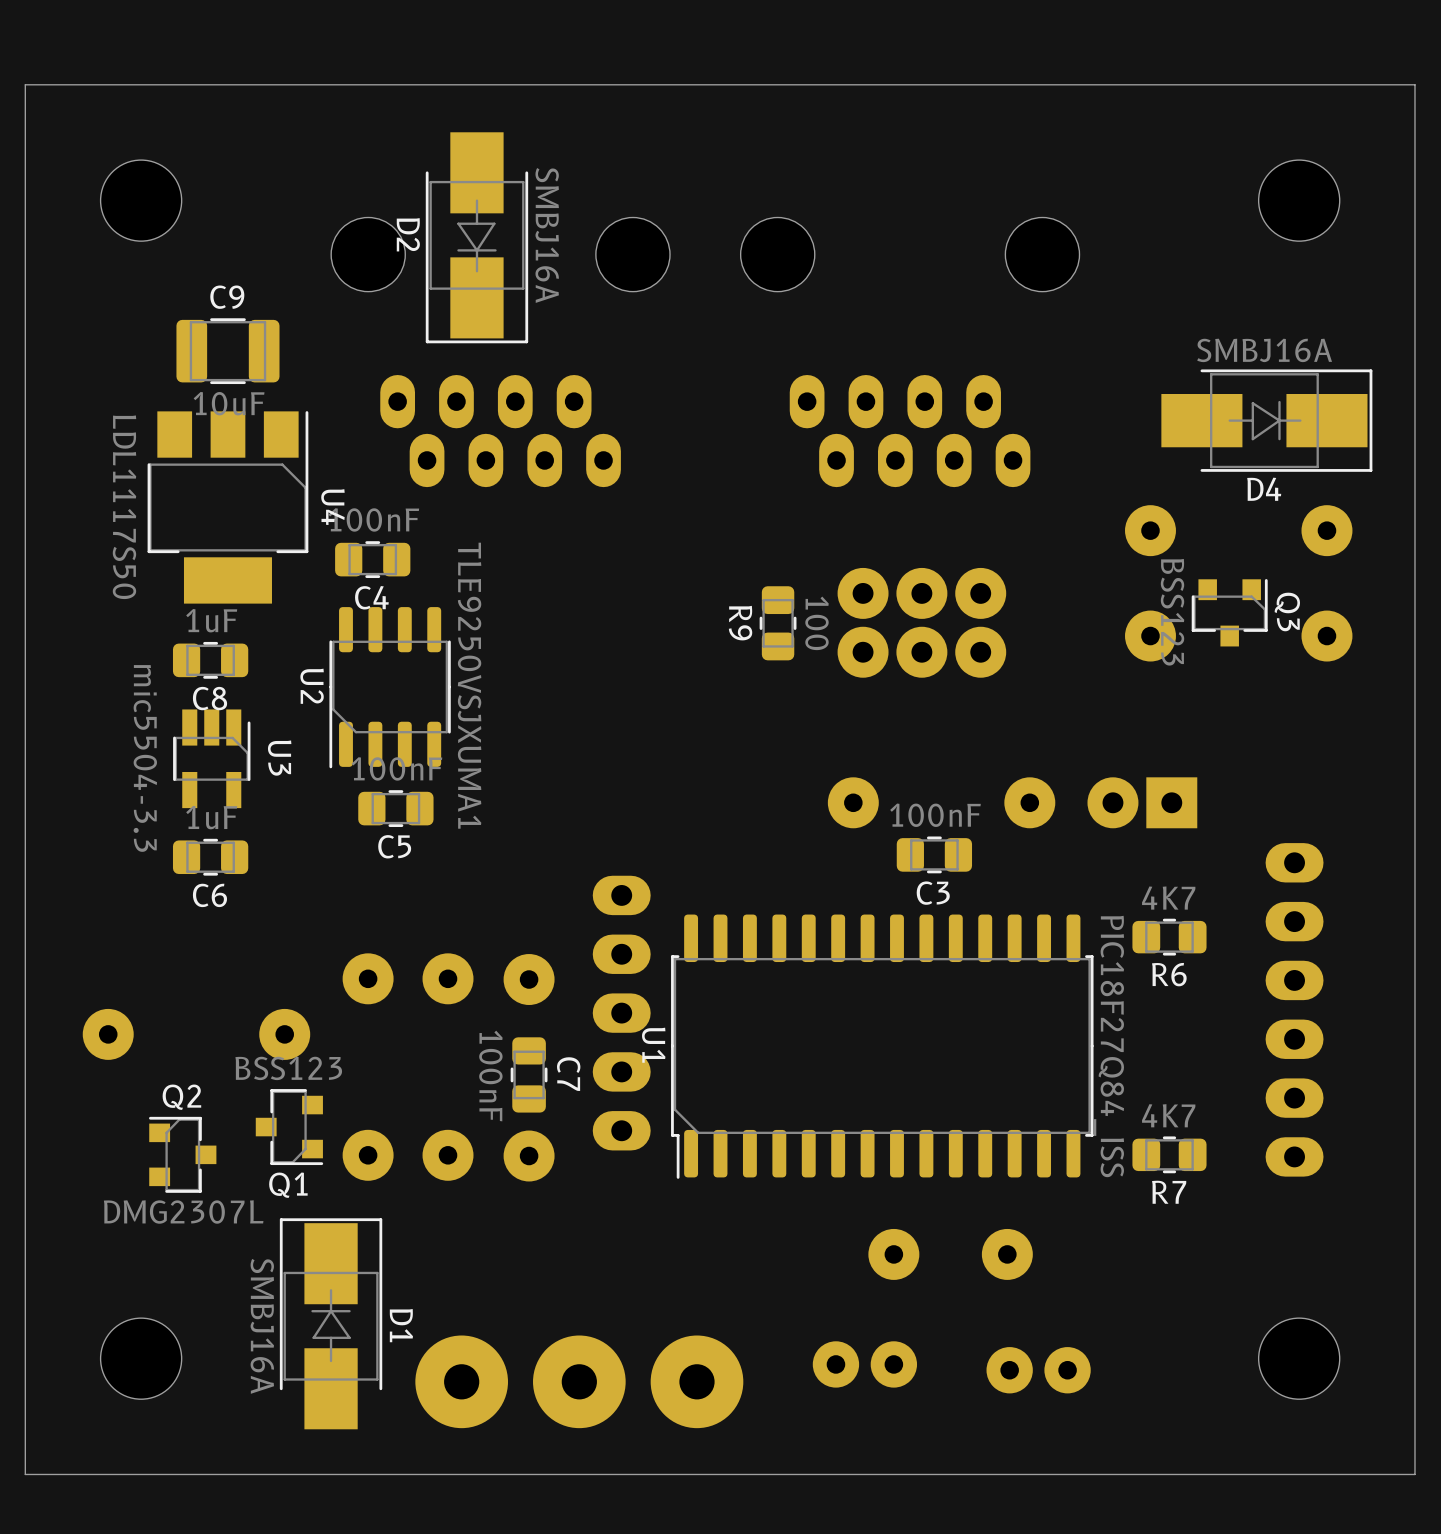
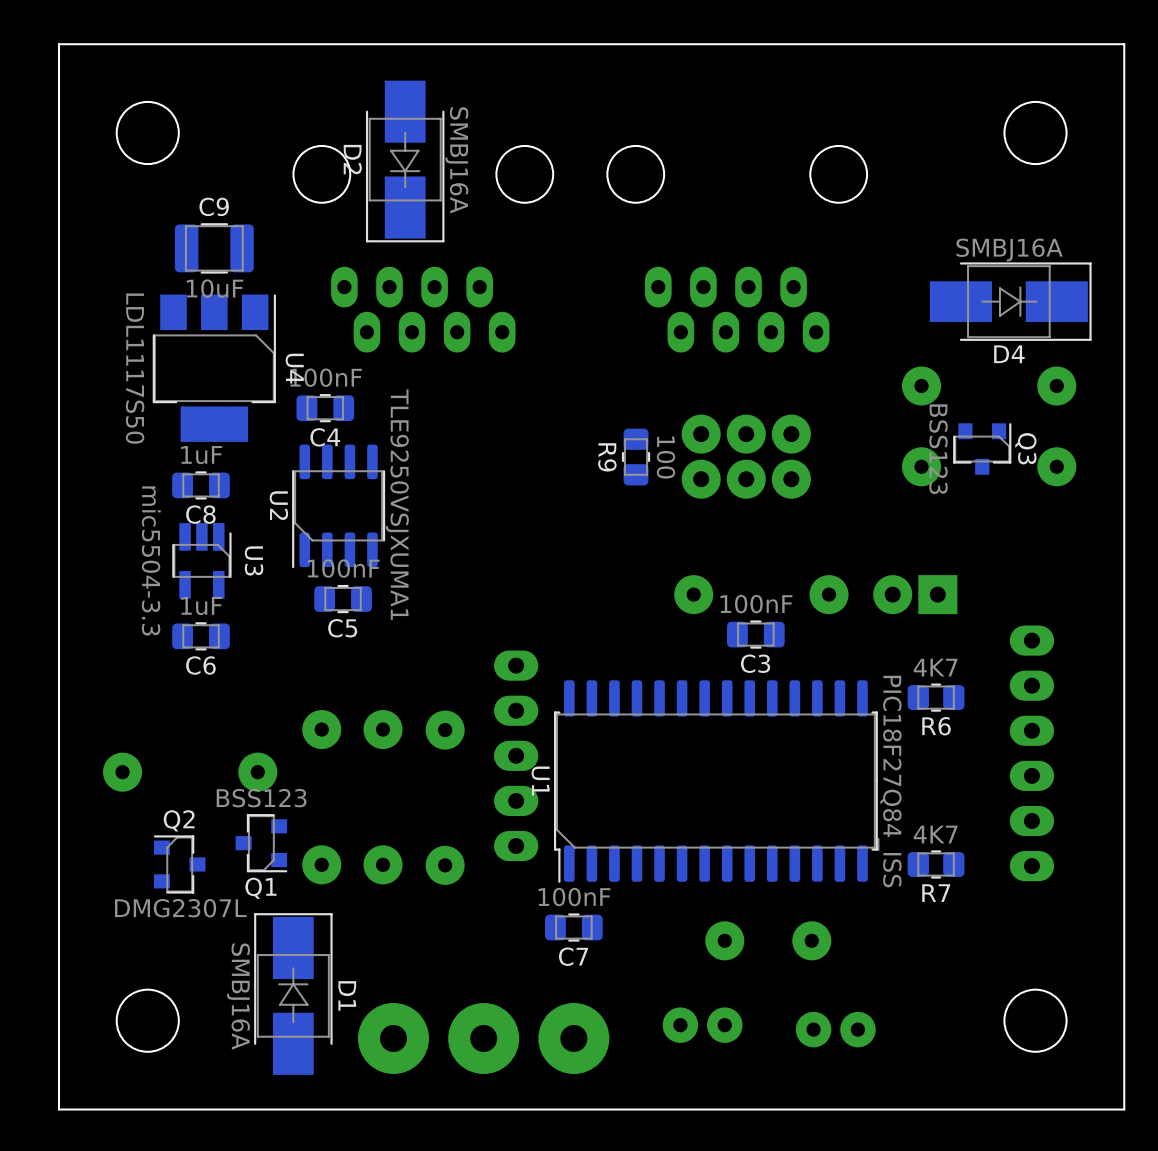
C7 rotation: 0° (529, 1074) -> 90° clockwise (573, 927)
C7 position: (529, 1074) -> (573, 927)

